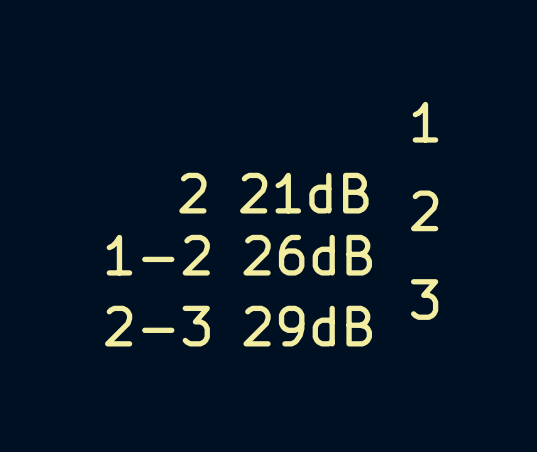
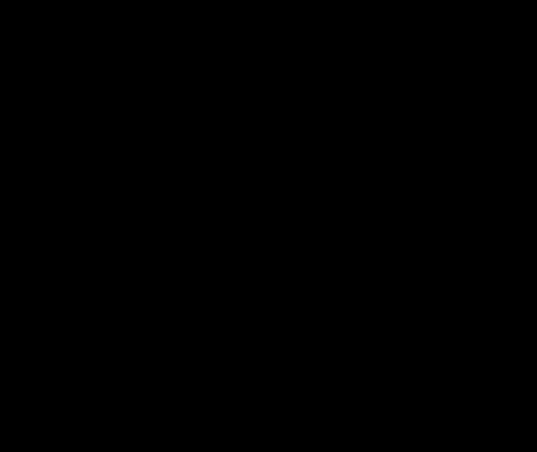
text: 1 (425, 122) -> none
text: 2 21dB (273, 193) -> none
text: 2 (424, 210) -> none
text: 1-2 26dB (239, 255) -> none
text: 3 (424, 299) -> none
text: 2-3 29dB (238, 326) -> none

